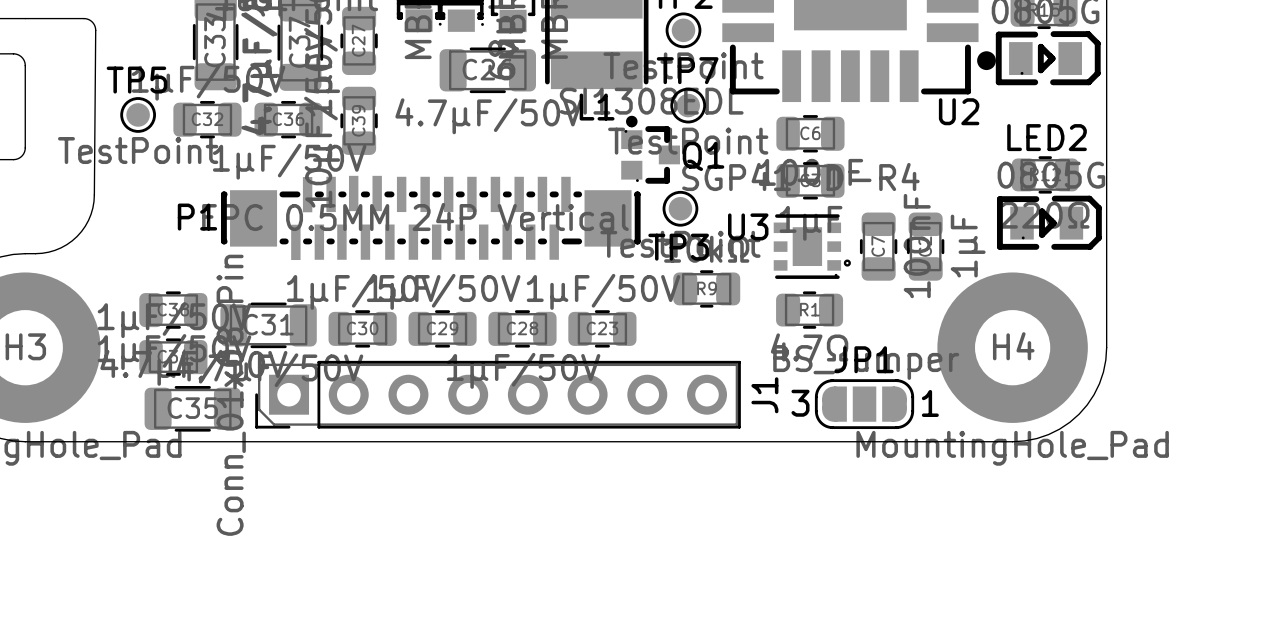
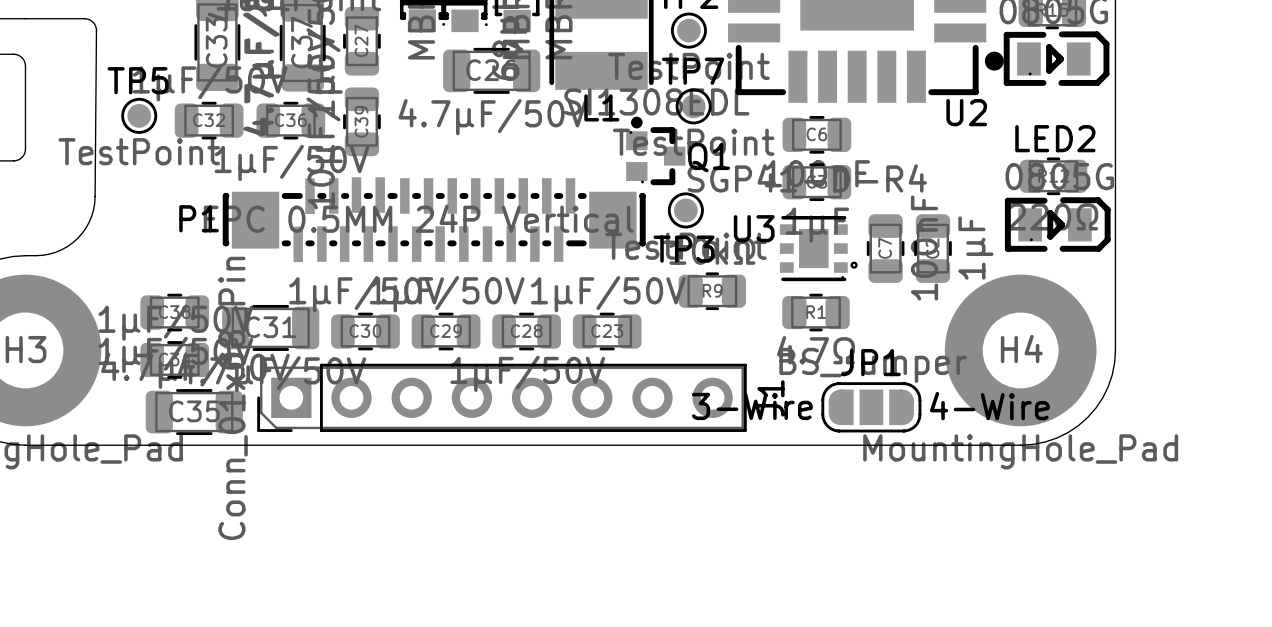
JP1 text: none -> 4-Wire (989, 406)
JP1 text: none -> 3-Wire (752, 406)
JP1 text: 3 (800, 403) -> none
JP1 text: 1 (930, 403) -> none

